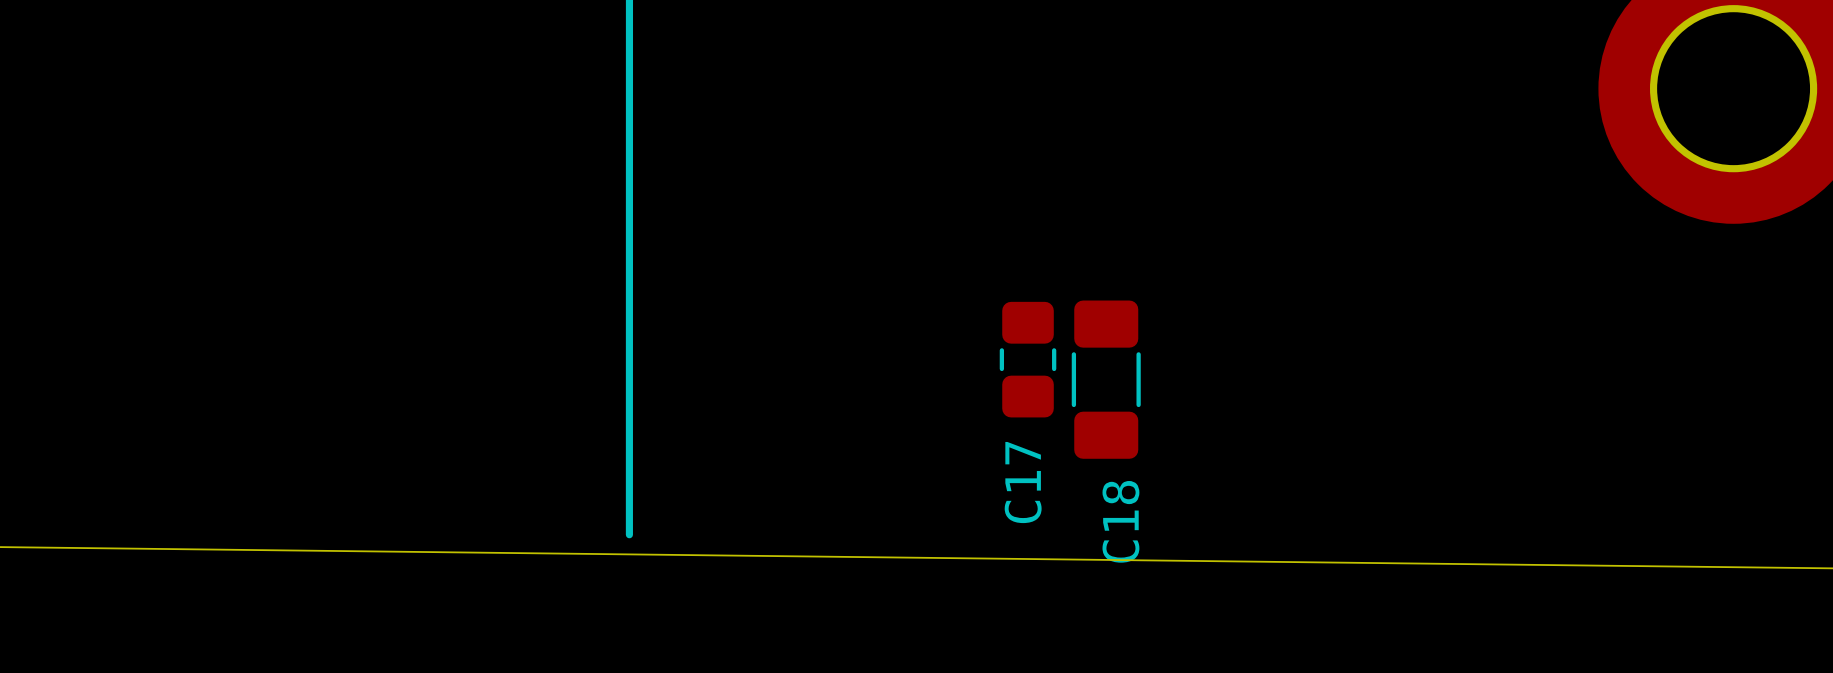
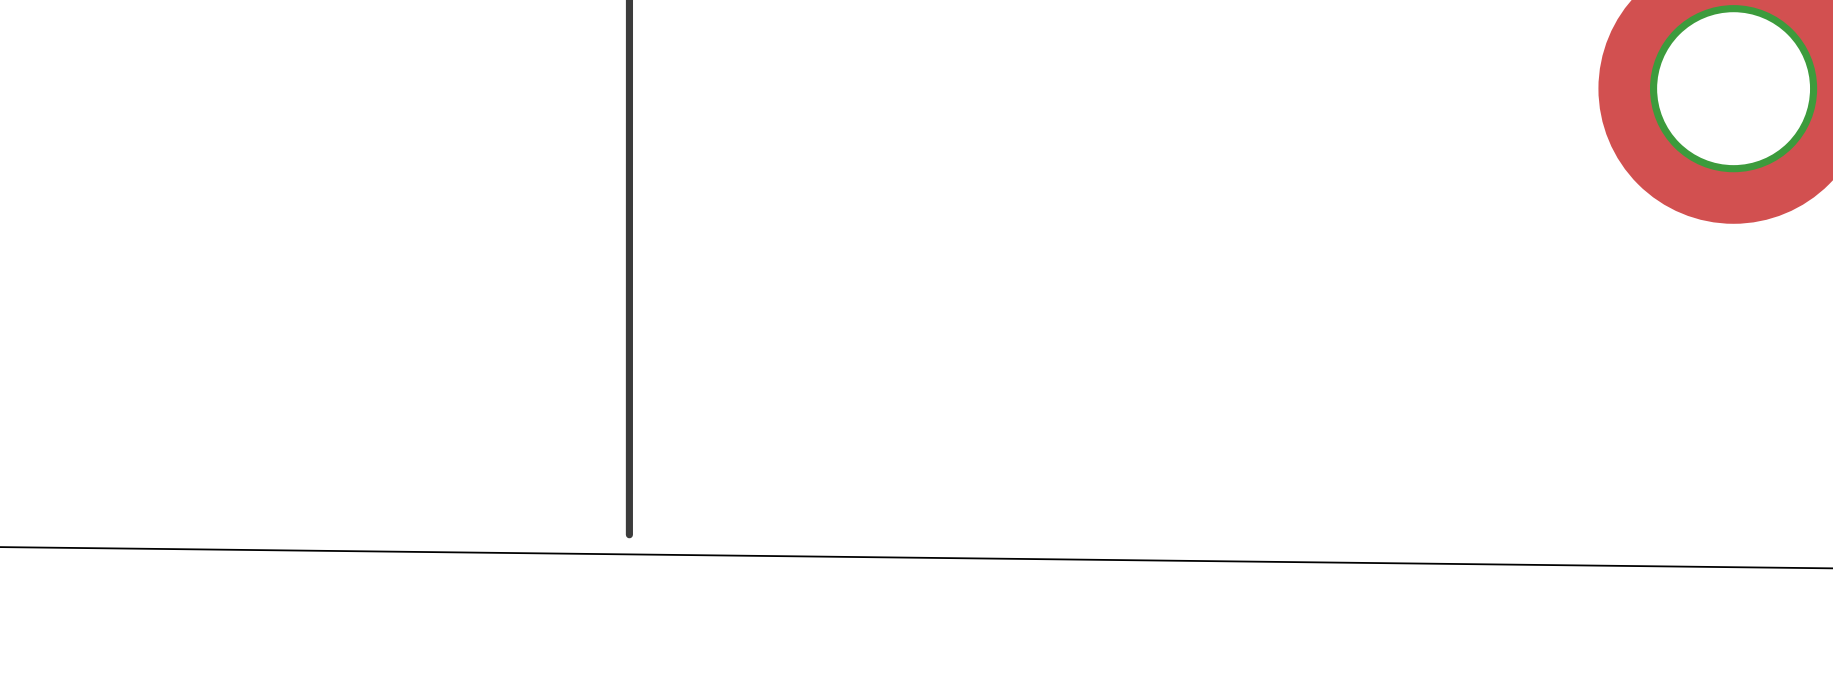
C17: (1028, 359) -> none
C18: (1106, 379) -> none

